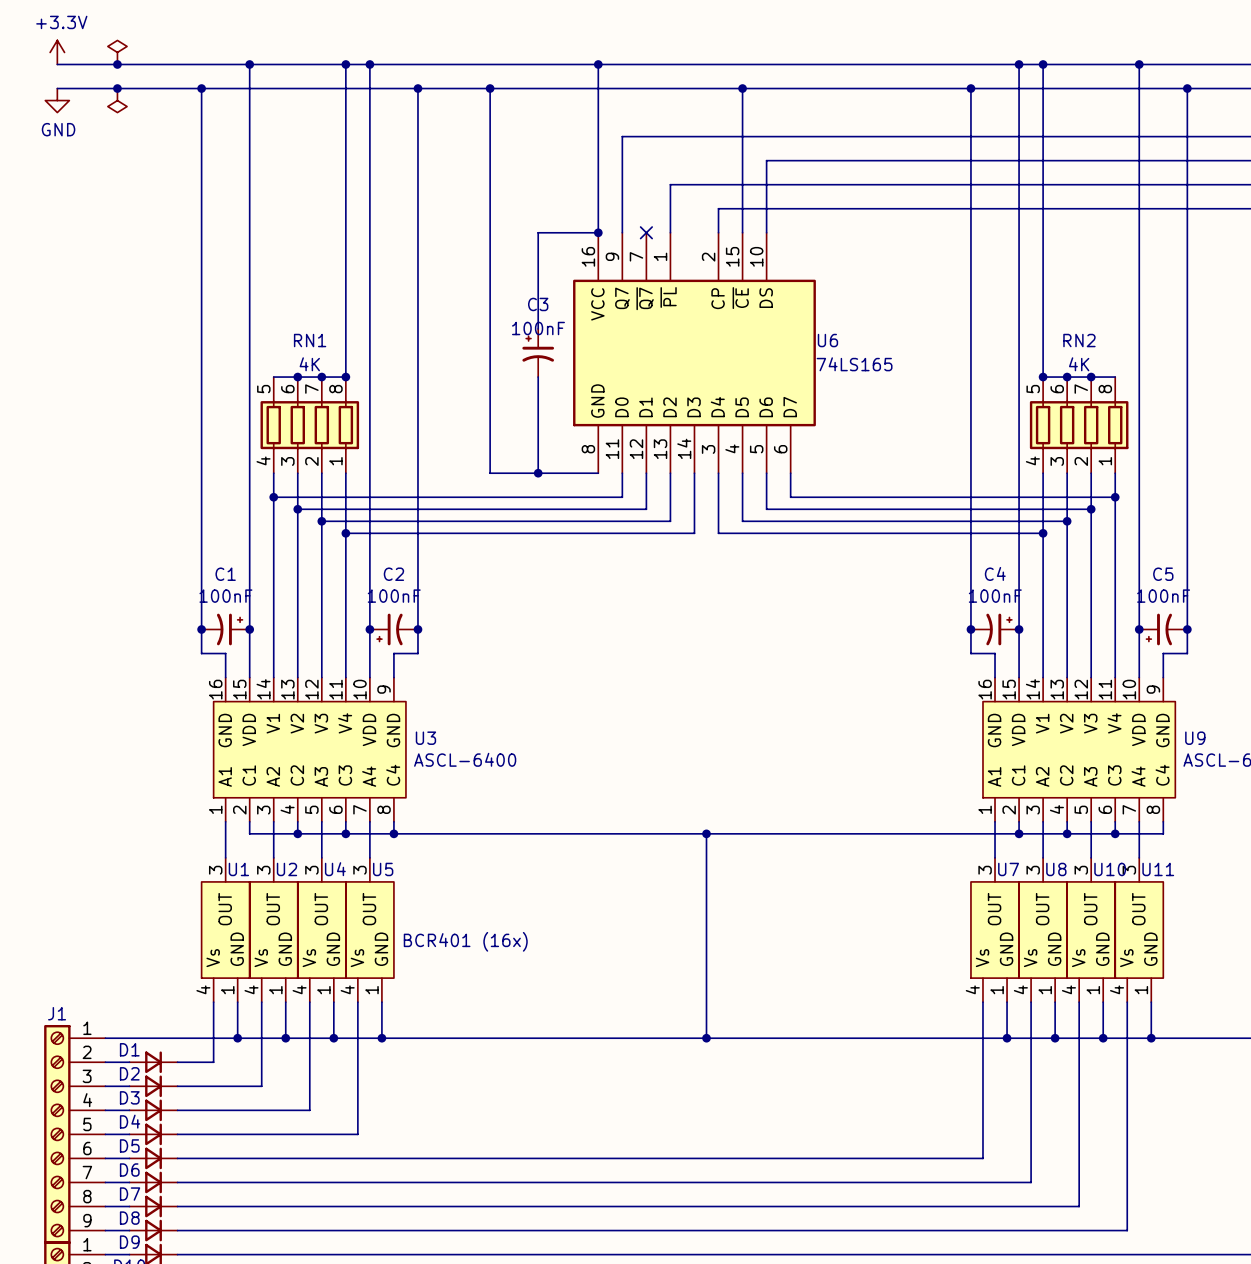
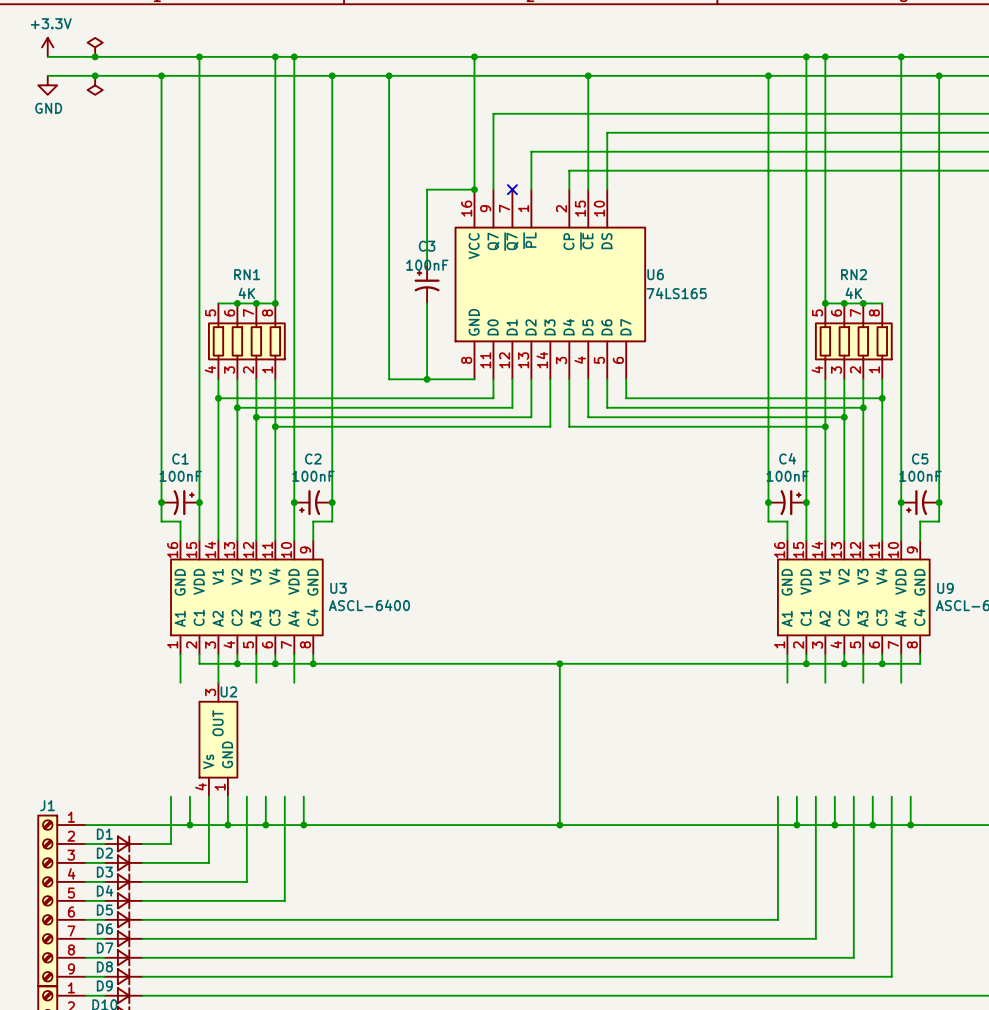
U1: (225, 930) -> none
U4: (321, 930) -> none
U5: BCR401 (16x) (369, 930) -> none
U7: (995, 930) -> none
U8: (1043, 930) -> none
U10: (1091, 930) -> none
U11: (1139, 930) -> none

